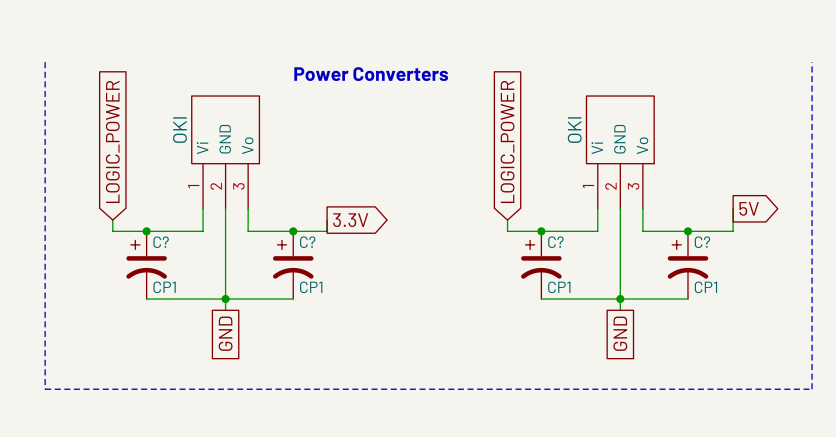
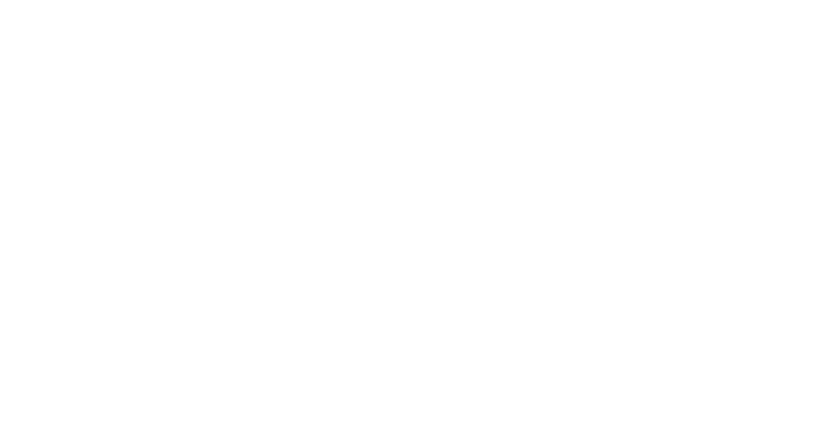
line: (45, 62) (45, 389) (812, 389) (812, 62) -> none
text: Power Converters (371, 74) -> none
global label: LOGIC_POWER (112, 141) -> none
global label: LOGIC_POWER (507, 141) -> none
part: OKI (225, 152) -> none
part: OKI (620, 152) -> none
wire: (203, 208) (203, 231) (112, 231) (112, 220) -> none
wire: (225, 208) (225, 310) -> none
wire: (248, 208) (248, 231) (327, 231) (327, 220) -> none
wire: (597, 208) (597, 231) (507, 231) (507, 220) -> none
wire: (620, 208) (620, 310) -> none
wire: (642, 208) (642, 231) (733, 231) (733, 208) -> none
global label: 5V (749, 208) -> none
global label: 3.3V (350, 220) -> none
junction: (146, 231) -> none
junction: (293, 231) -> none
junction: (541, 231) -> none
junction: (688, 231) -> none
C?: CP1 (146, 265) -> none
C?: CP1 (293, 265) -> none
C?: CP1 (541, 265) -> none
C?: CP1 (688, 265) -> none
wire: (146, 299) (293, 299) -> none
junction: (225, 299) -> none
wire: (541, 299) (688, 299) -> none
junction: (620, 299) -> none
global label: GND (225, 333) -> none
global label: GND (620, 333) -> none

